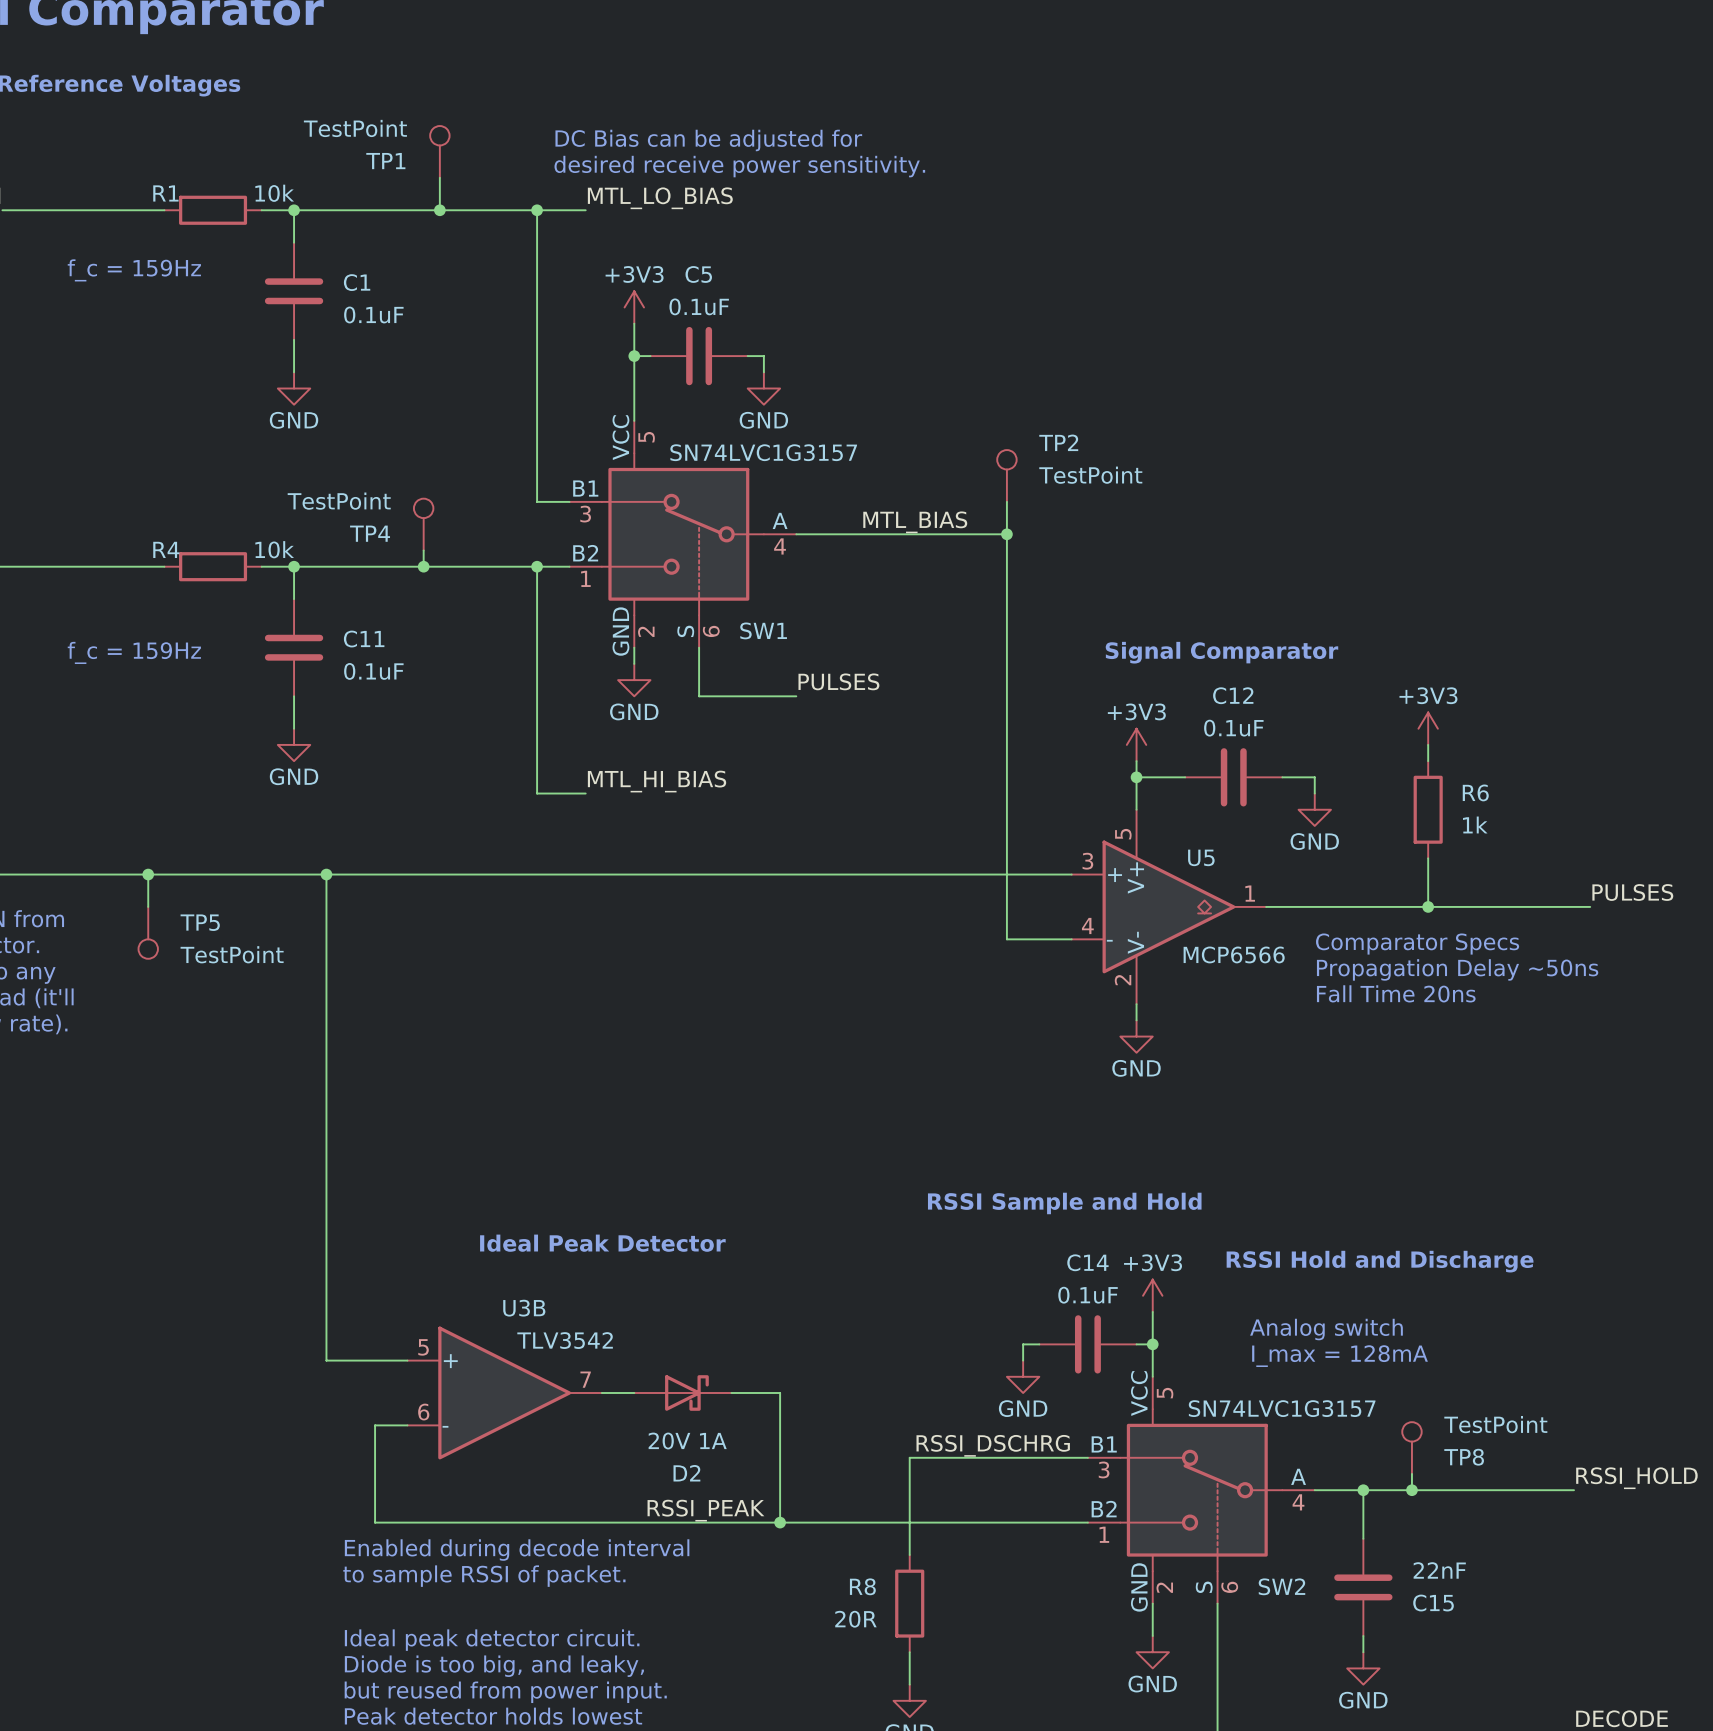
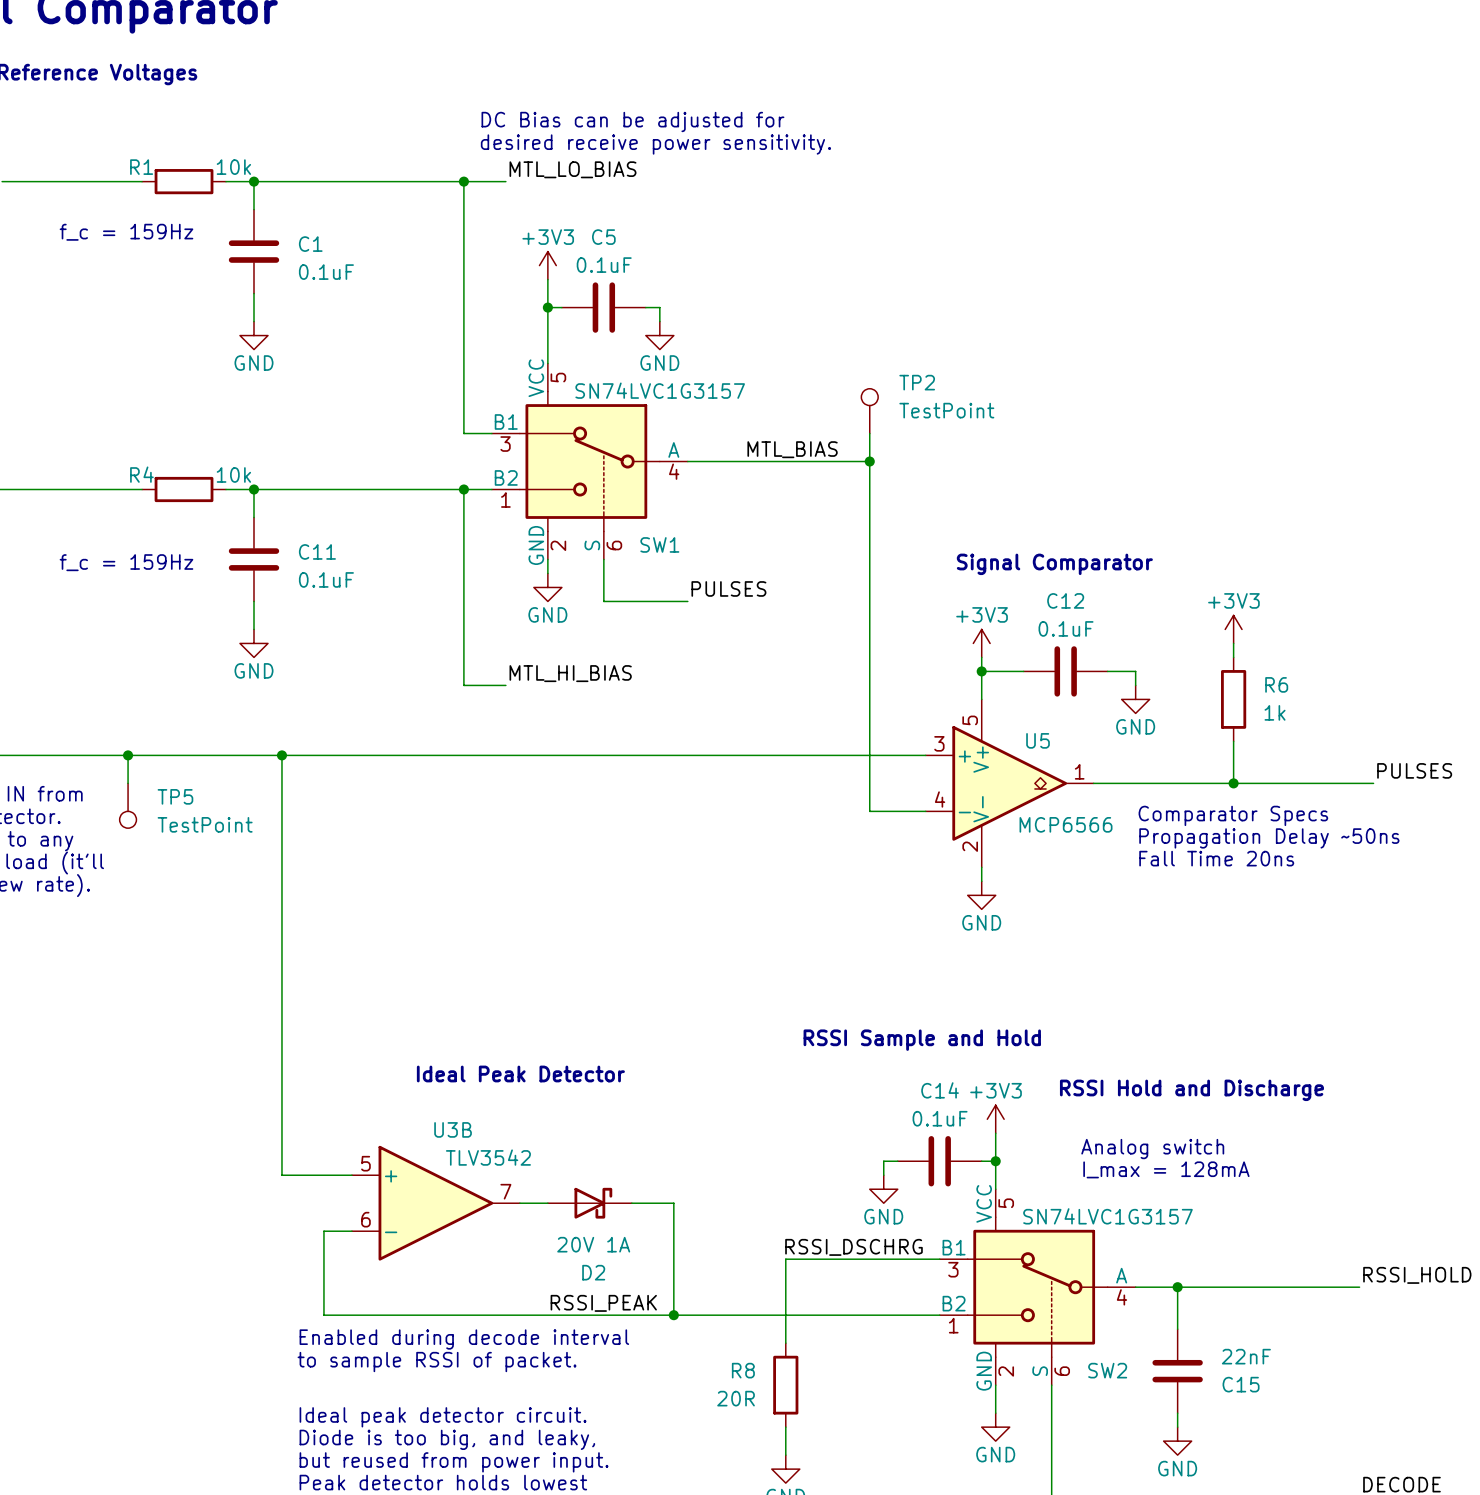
TP1: TestPoint (439, 151) -> none
wire: (439, 177) (439, 210) -> none
junction: (439, 210) -> none
TP4: TestPoint (423, 524) -> none
wire: (423, 550) (423, 566) -> none
junction: (423, 566) -> none
TP8: TestPoint (1411, 1448) -> none
wire: (1411, 1474) (1411, 1490) -> none
junction: (1411, 1490) -> none

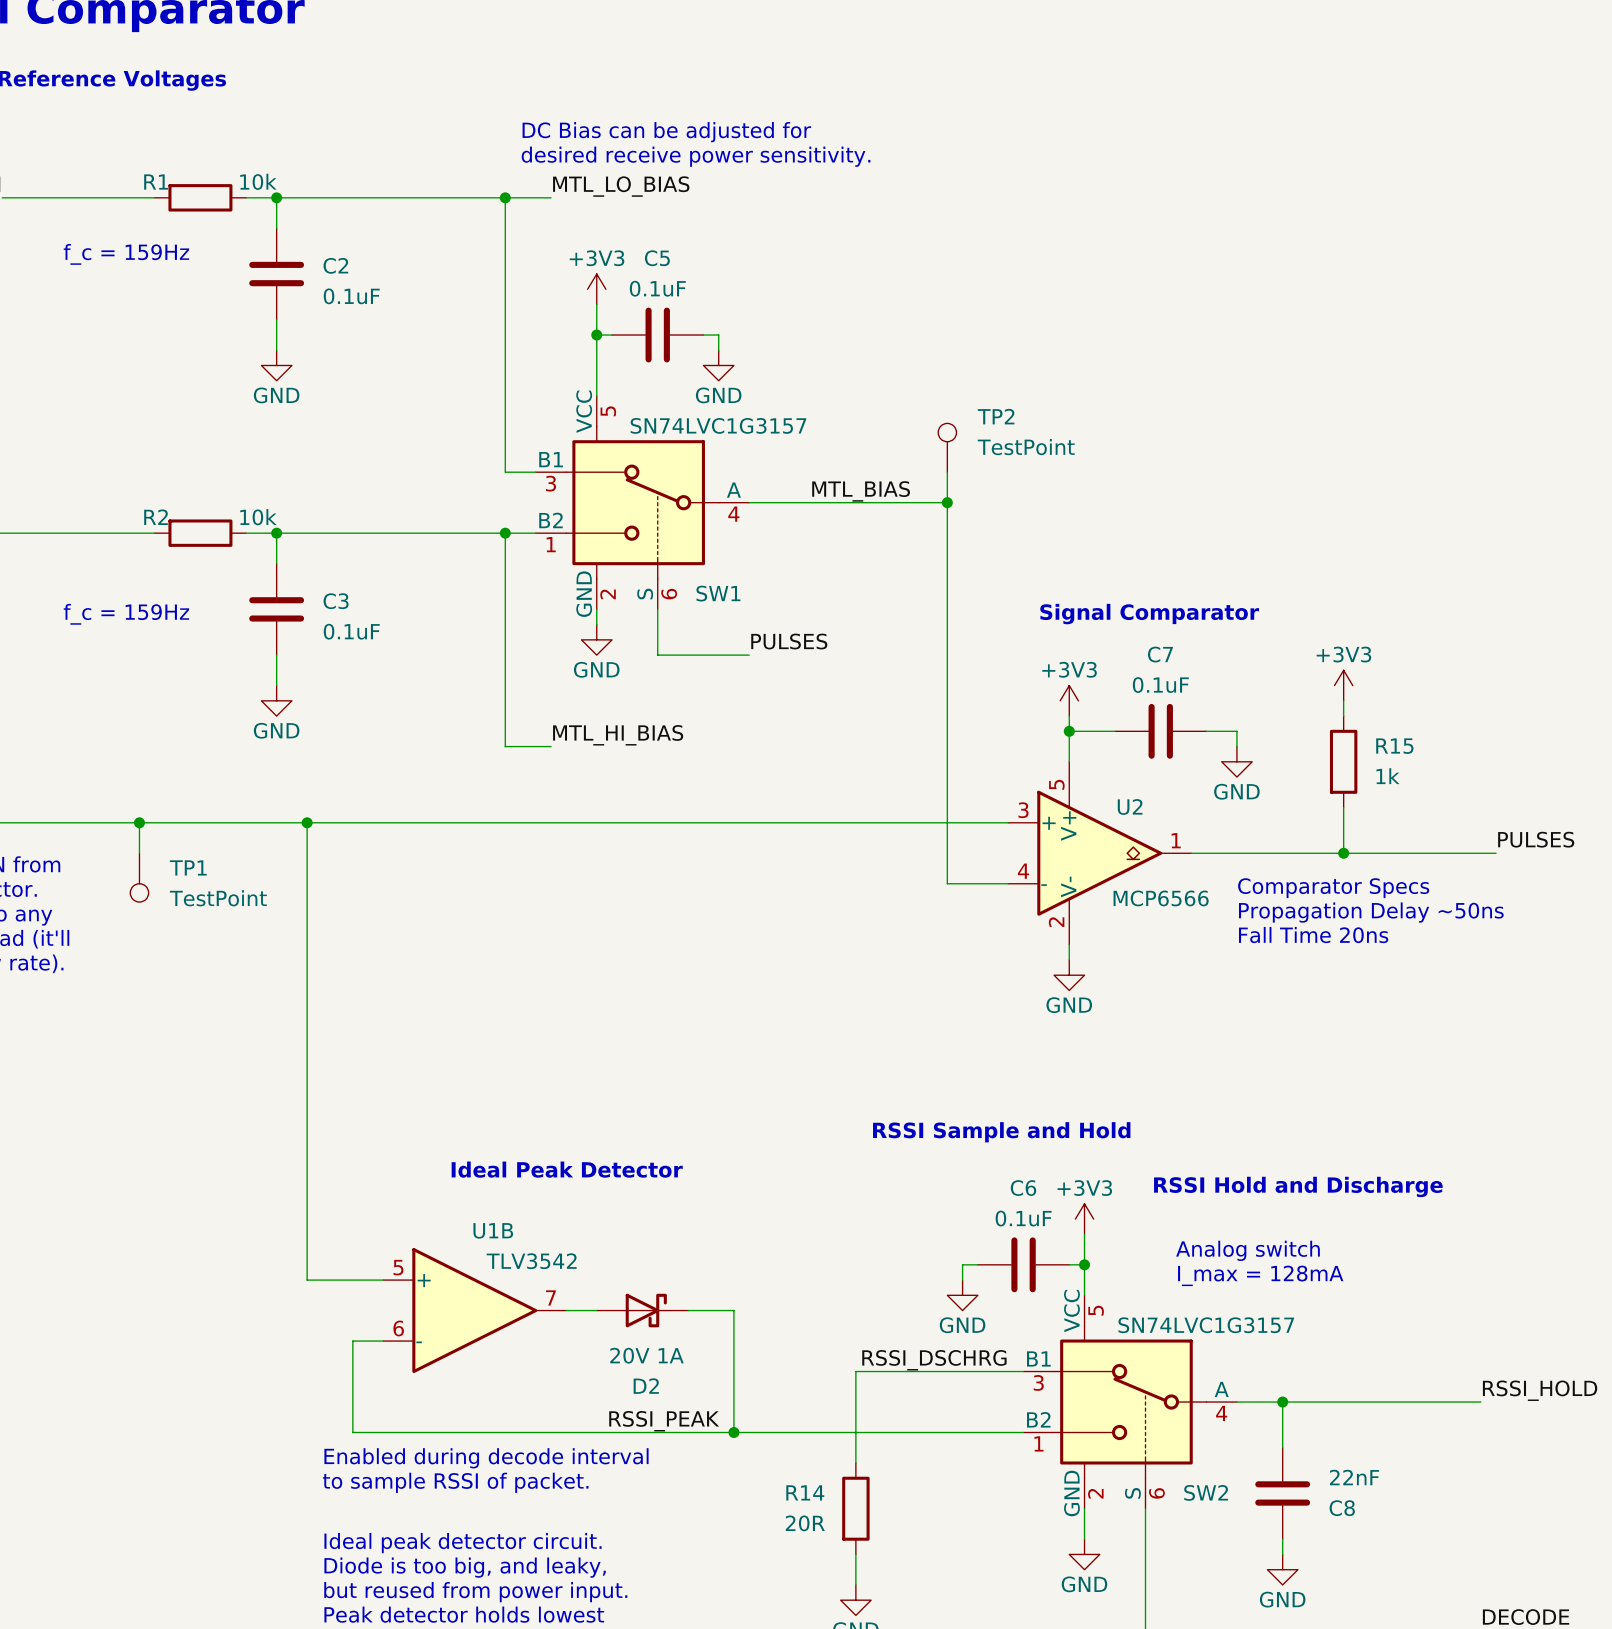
C1 name: C1 (310, 244) -> C2 (335, 265)
R4 name: R4 (141, 474) -> R2 (156, 517)
C11 name: C11 (317, 551) -> C3 (336, 601)
C12 name: C12 (1065, 600) -> C7 (1160, 654)
R6 name: R6 (1276, 684) -> R15 (1394, 746)
U5 name: U5 (1038, 740) -> U2 (1130, 806)
TP5 name: TP5 (175, 796) -> TP1 (188, 867)
C14 name: C14 (940, 1090) -> C6 (1023, 1188)
U3B name: U3B (453, 1129) -> U1B (493, 1230)
R8 name: R8 (743, 1370) -> R14 (805, 1492)
C15 name: C15 (1241, 1384) -> C8 (1342, 1508)

